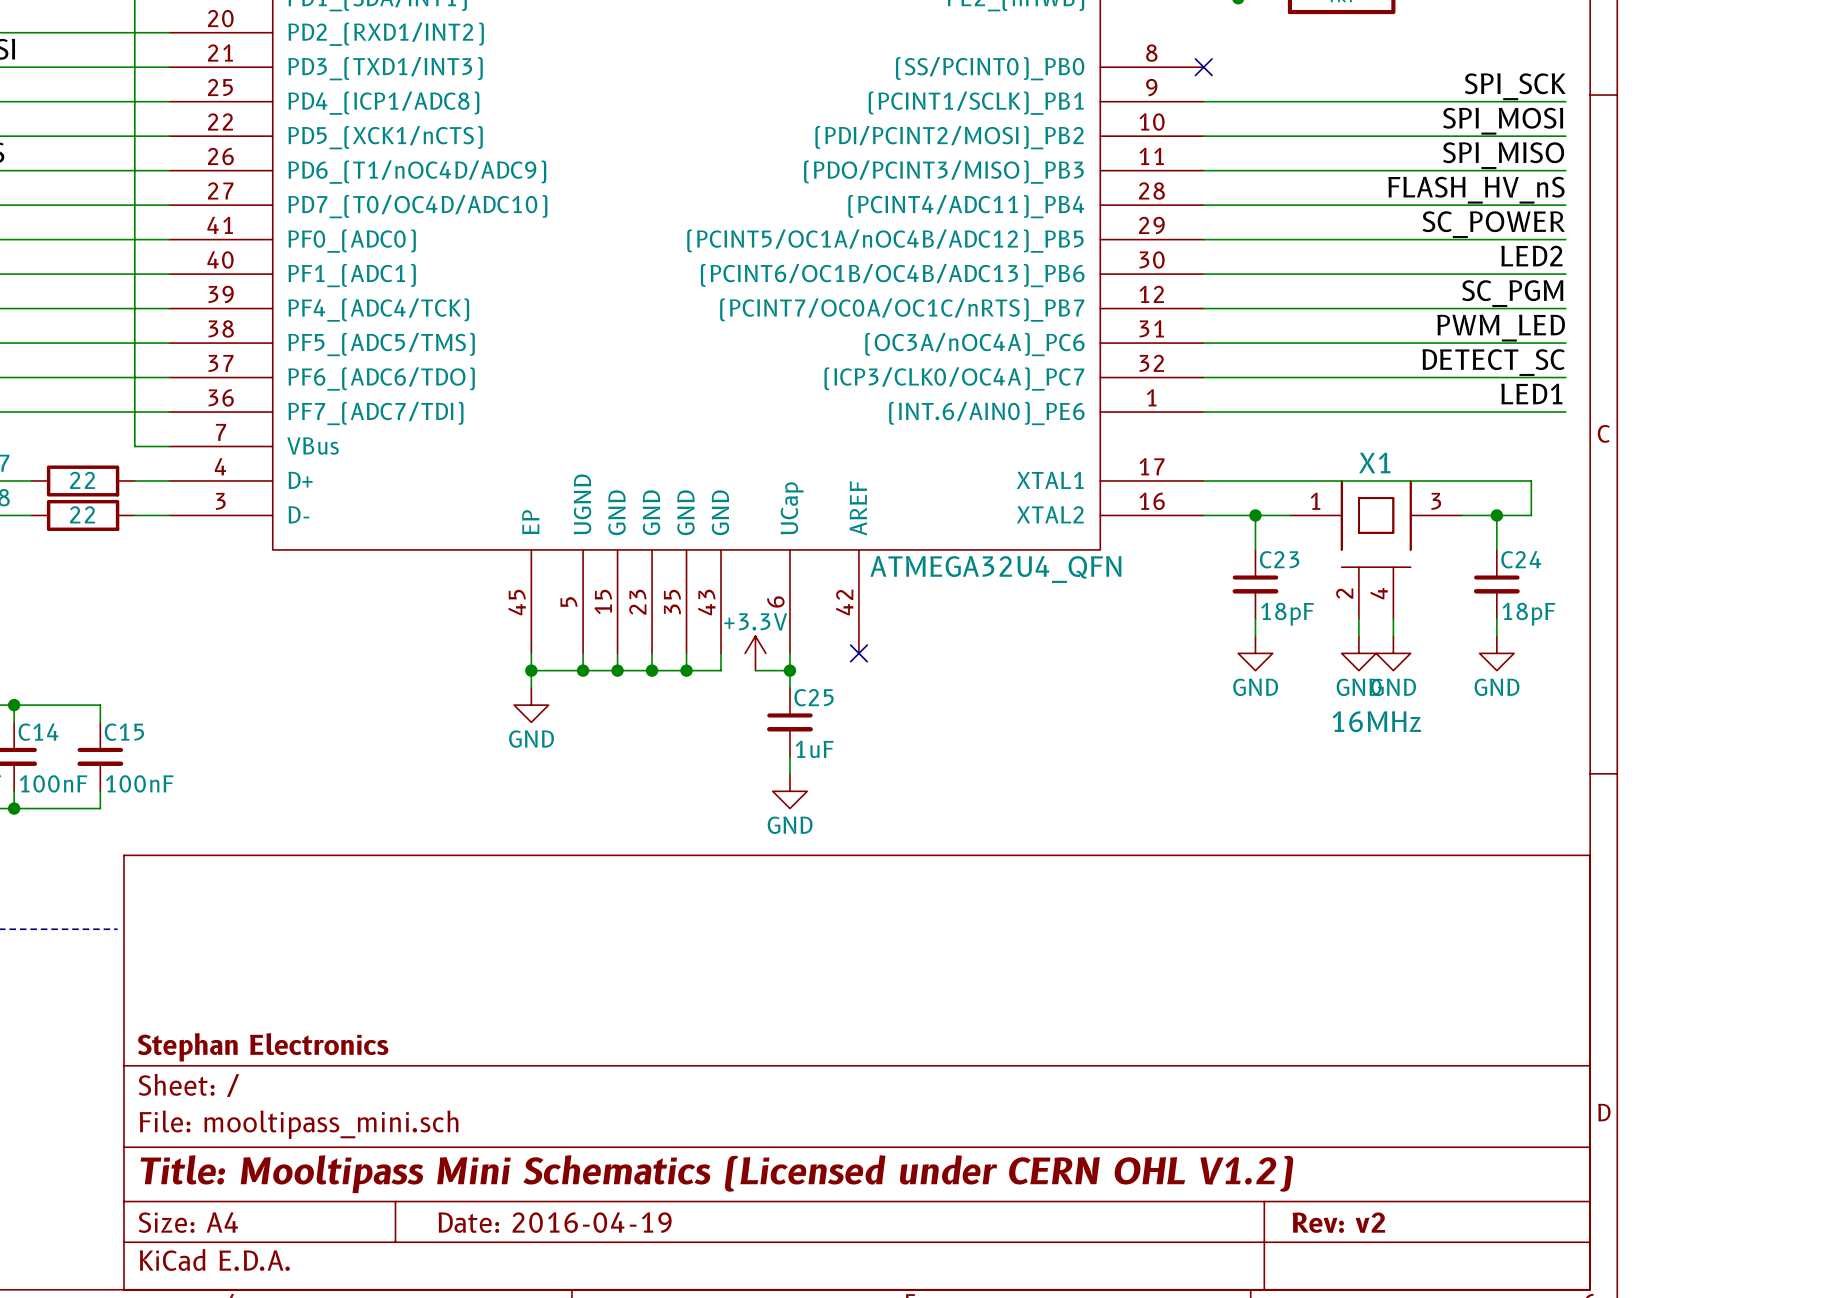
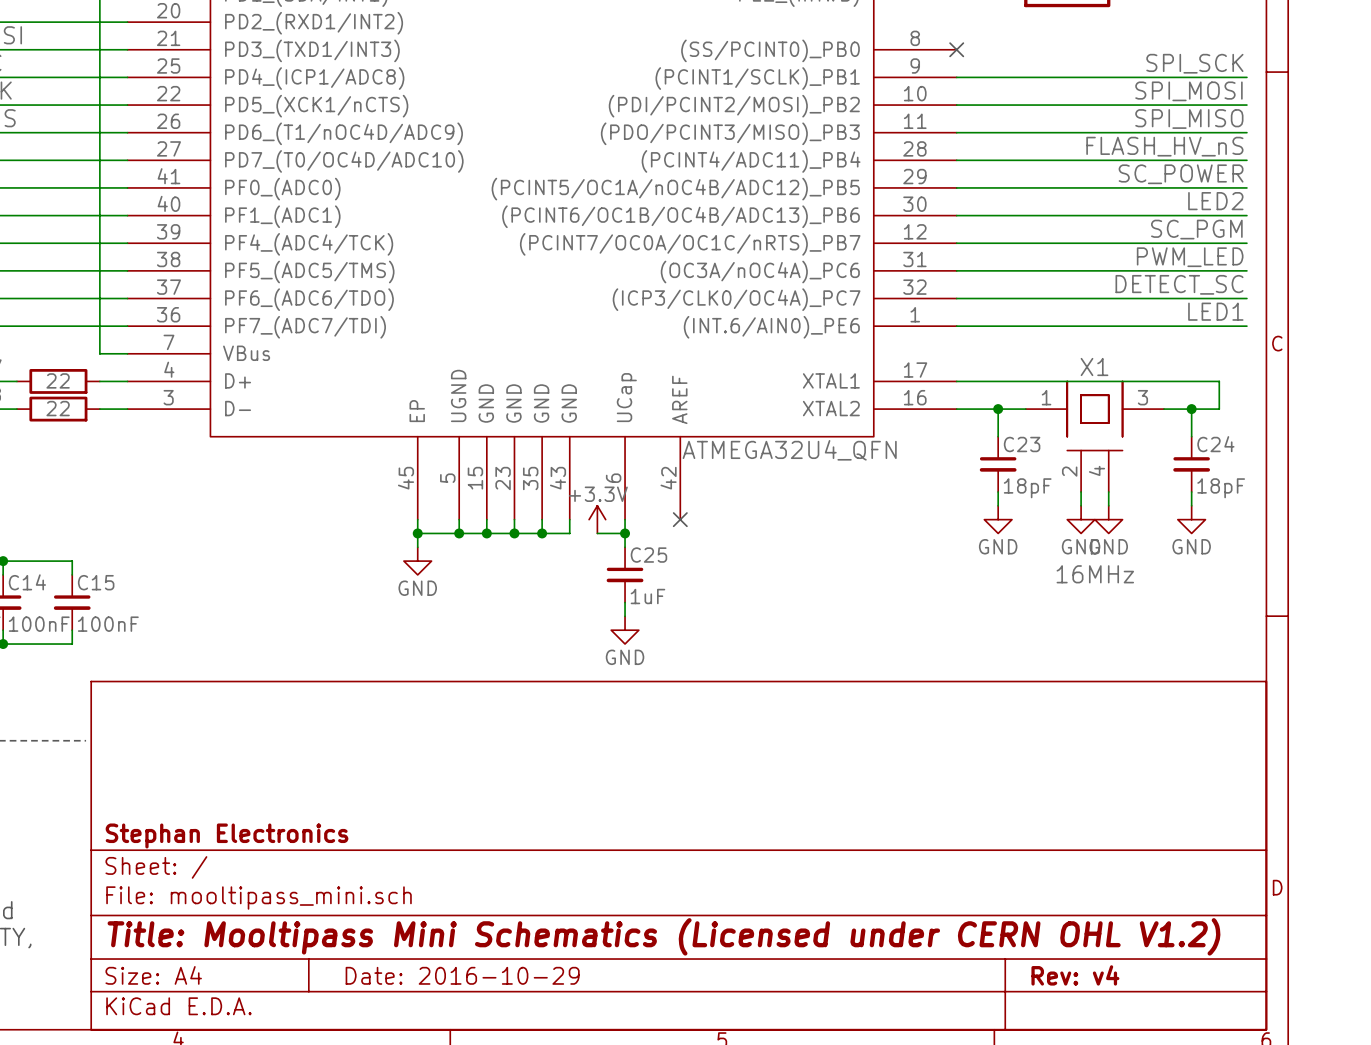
title block: Date: 2016-04-19 (555, 1222) -> Date: 2016-10-29 (462, 975)
title block: Rev: v2 (1338, 1222) -> Rev: v4 (1075, 975)

